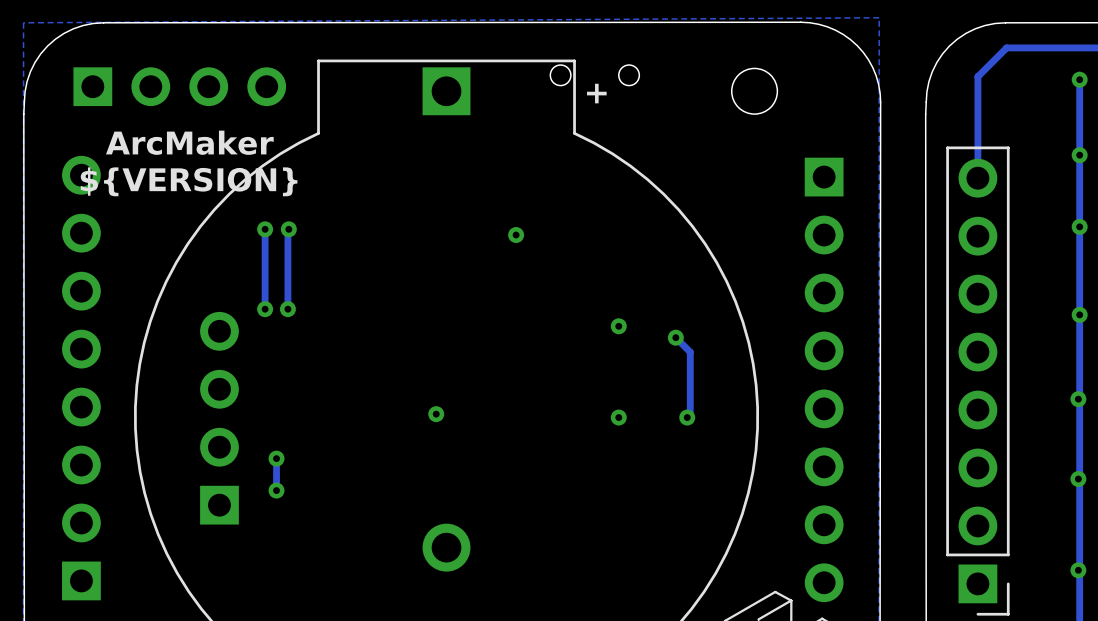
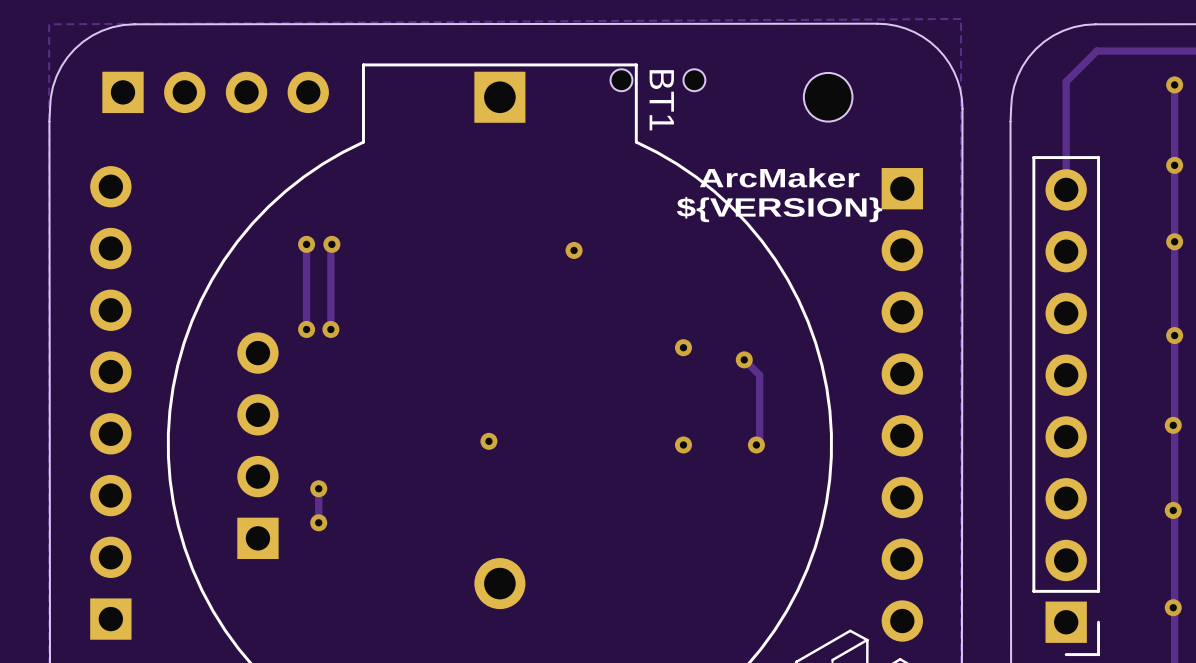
BT1 name: + (596, 93) -> BT1 (661, 100)
text position: ArcMaker (189, 142) -> ArcMaker (779, 177)
text position: ${VERSION} (189, 181) -> ${VERSION} (779, 209)

